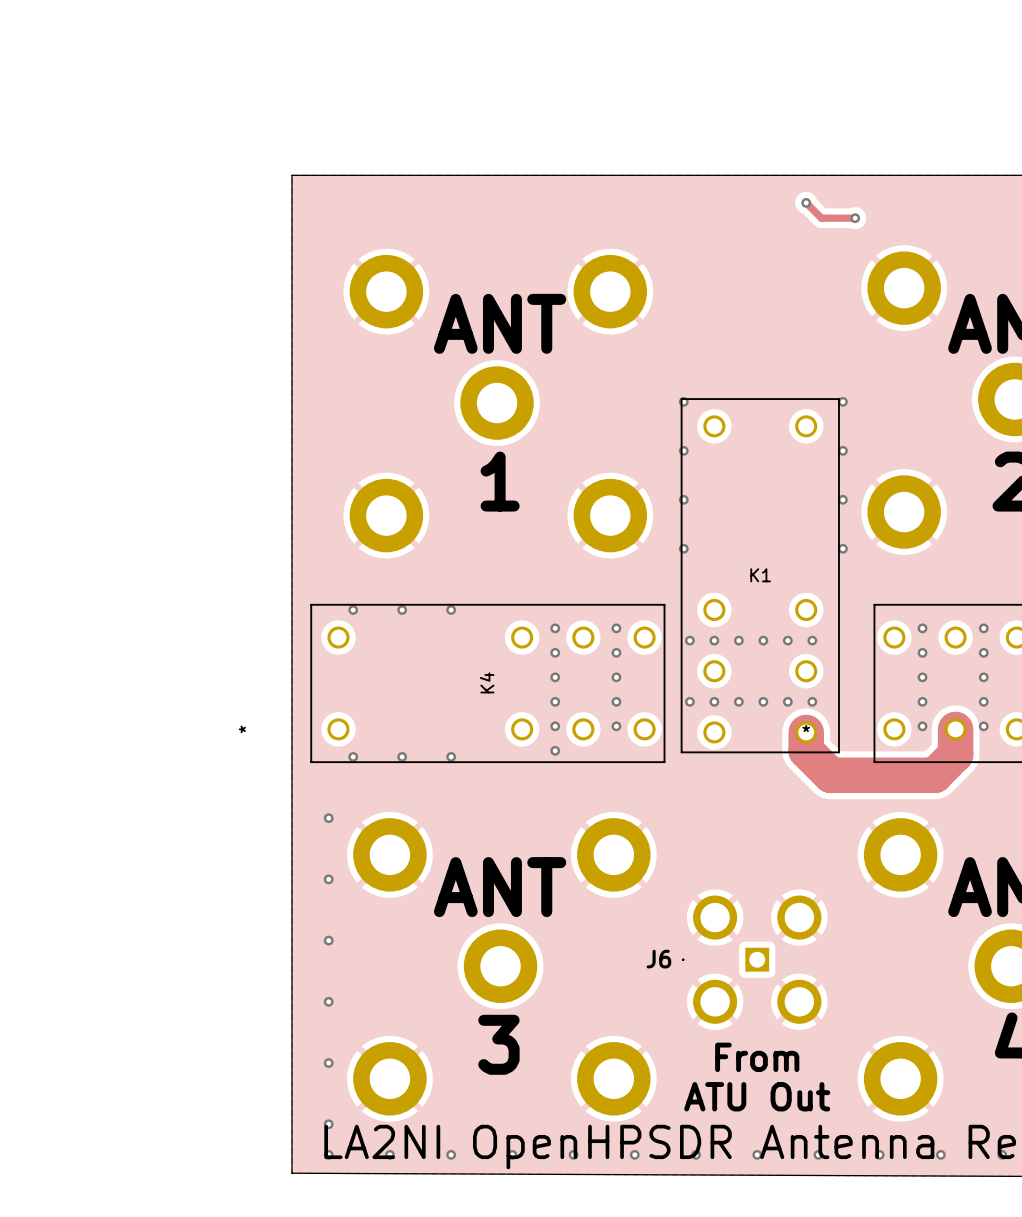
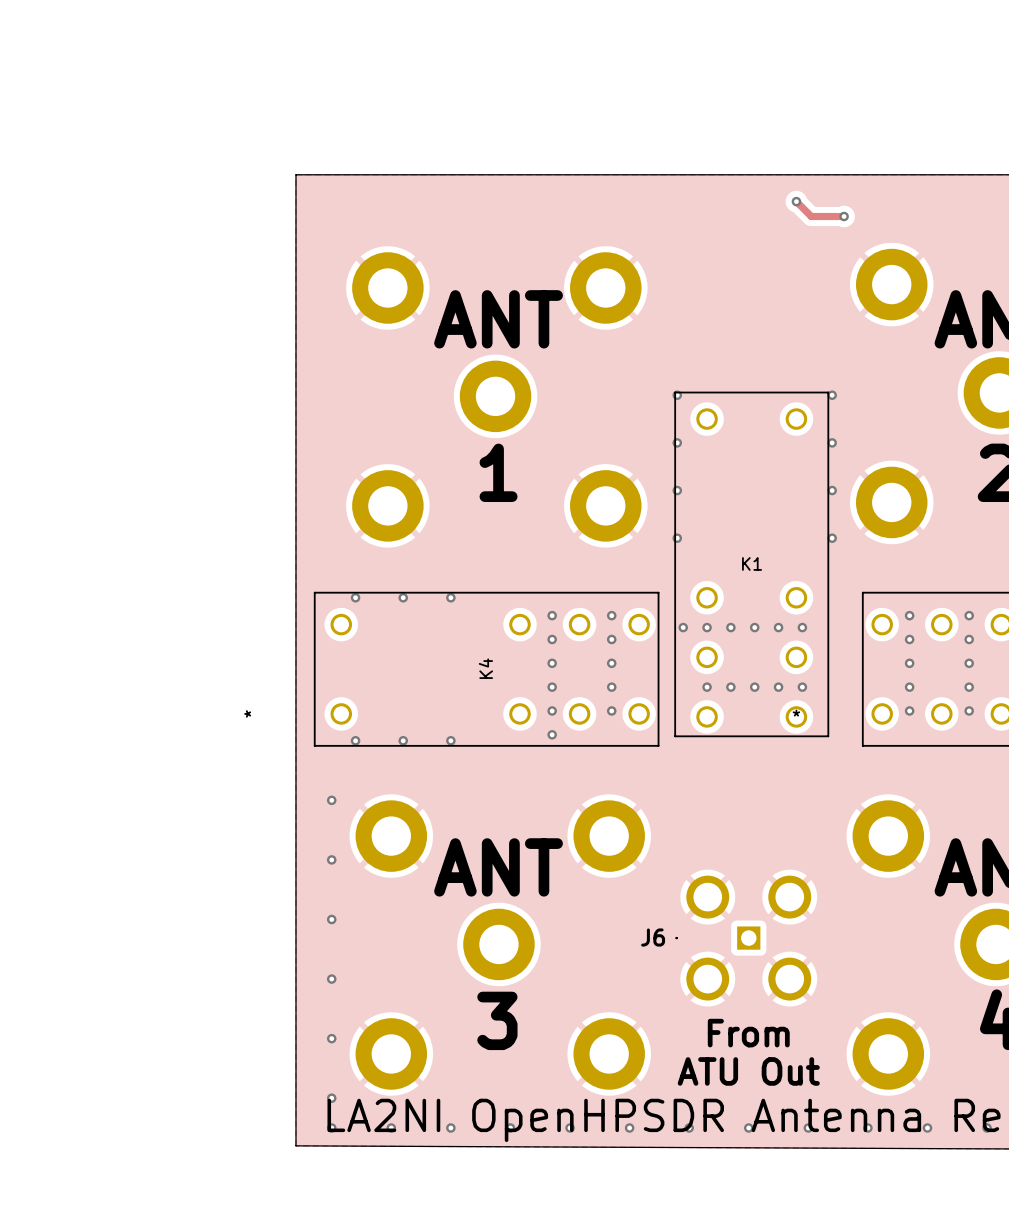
via: (689, 701) -> none
track: (955, 729) (955, 754) (934, 775) (830, 775) (806, 750) (806, 732) -> none

